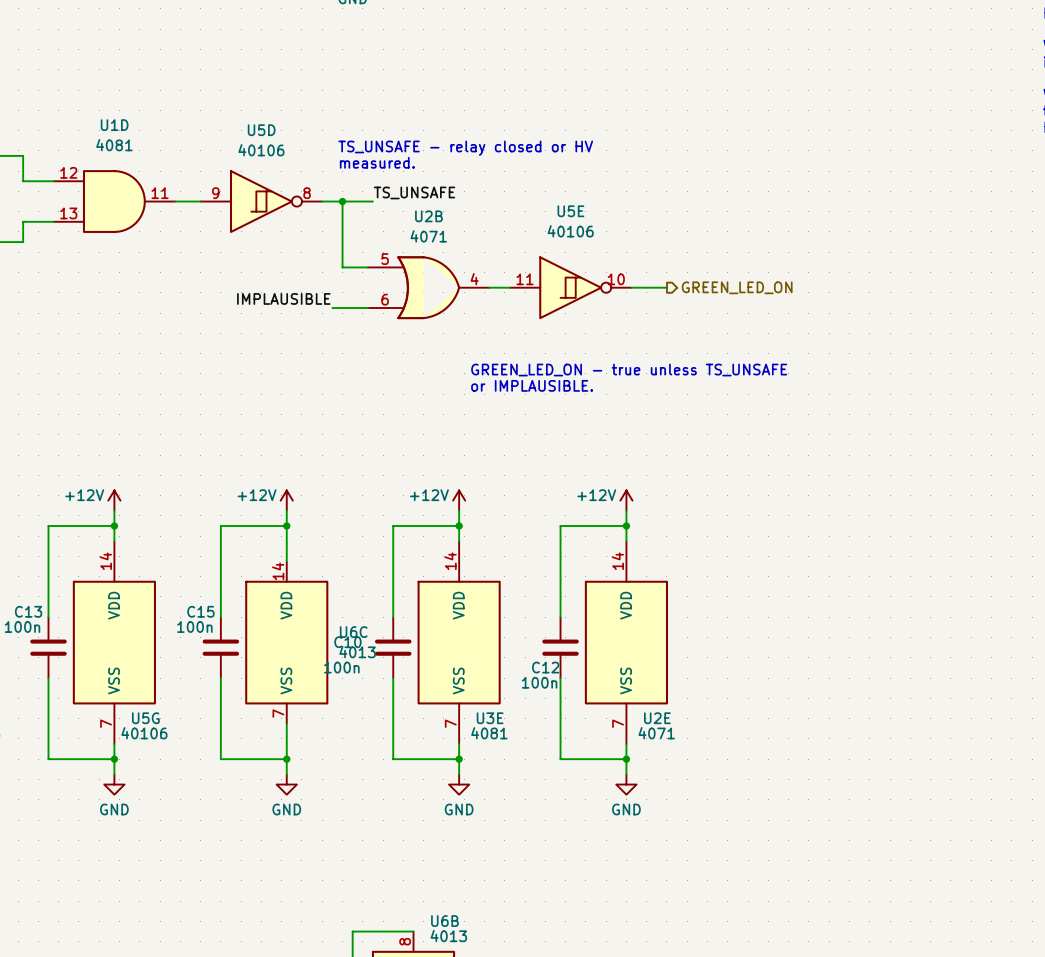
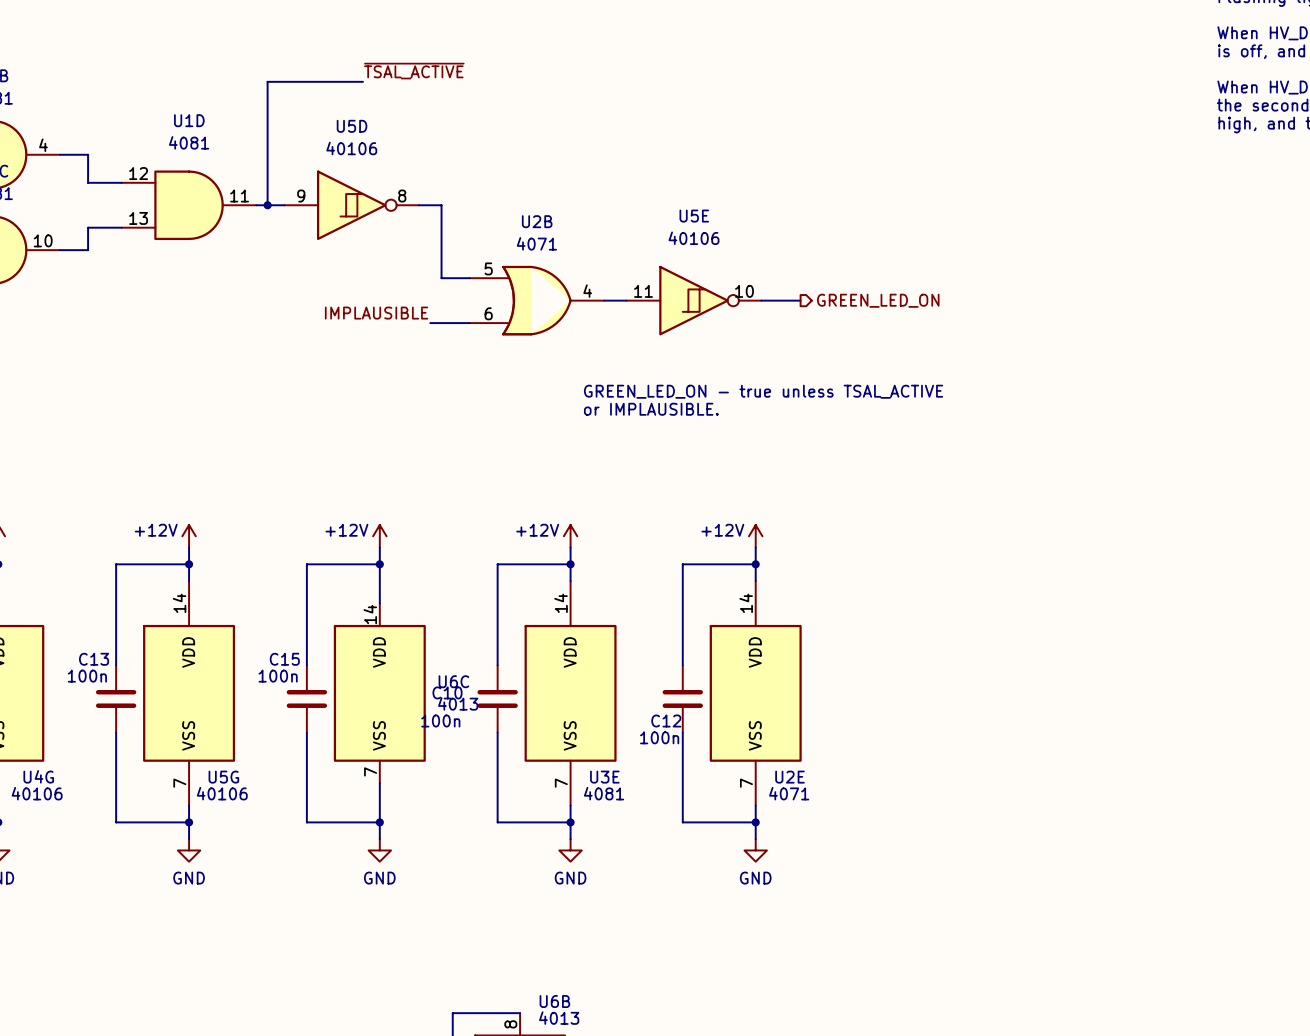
label: none -> ~{TSAL_ACTIVE} (414, 71)
wire: none -> (362, 81) (267, 81) (267, 205)
text: TS_UNSAFE - relay closed or HV (465, 148) -> none
text: measured. (377, 162) -> none
label: TS_UNSAFE (414, 192) -> none
junction: none -> (267, 205)
wire: (342, 201) (372, 201) -> none
junction: (342, 201) -> none
text: GREEN_LED_ON - true unless TS_UNSAFE (629, 370) -> GREEN_LED_ON - true unless TSAL_ACTIVE (763, 391)

